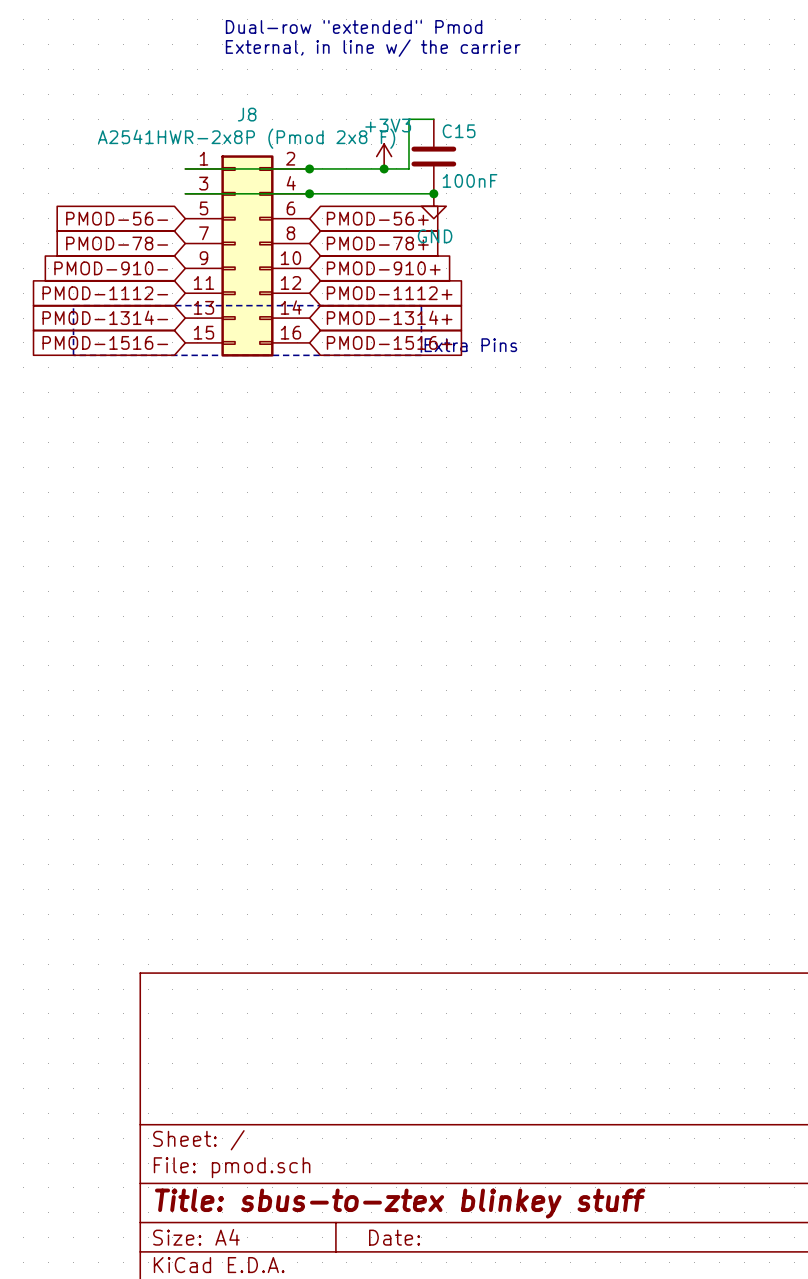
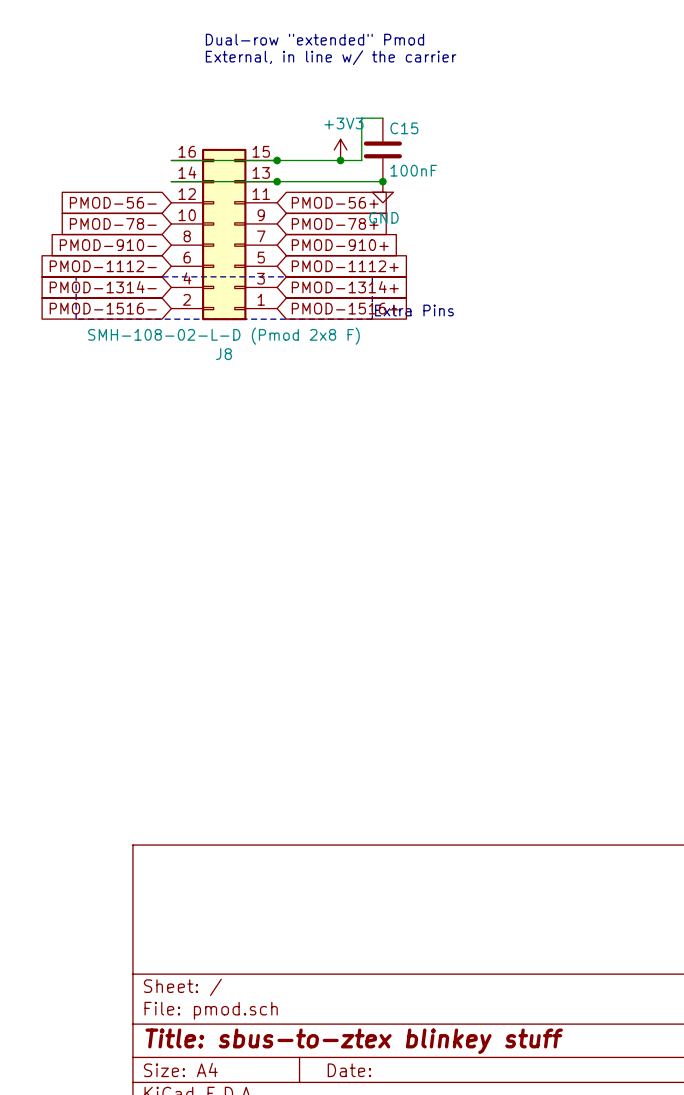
J8 value: A2541HWR-2x8P (Pmod 2x8 F) (246, 138) -> SMH-108-02-L-D (Pmod 2x8 F) (223, 336)
J8 rotation: 0° (247, 255) -> 180° (224, 234)

